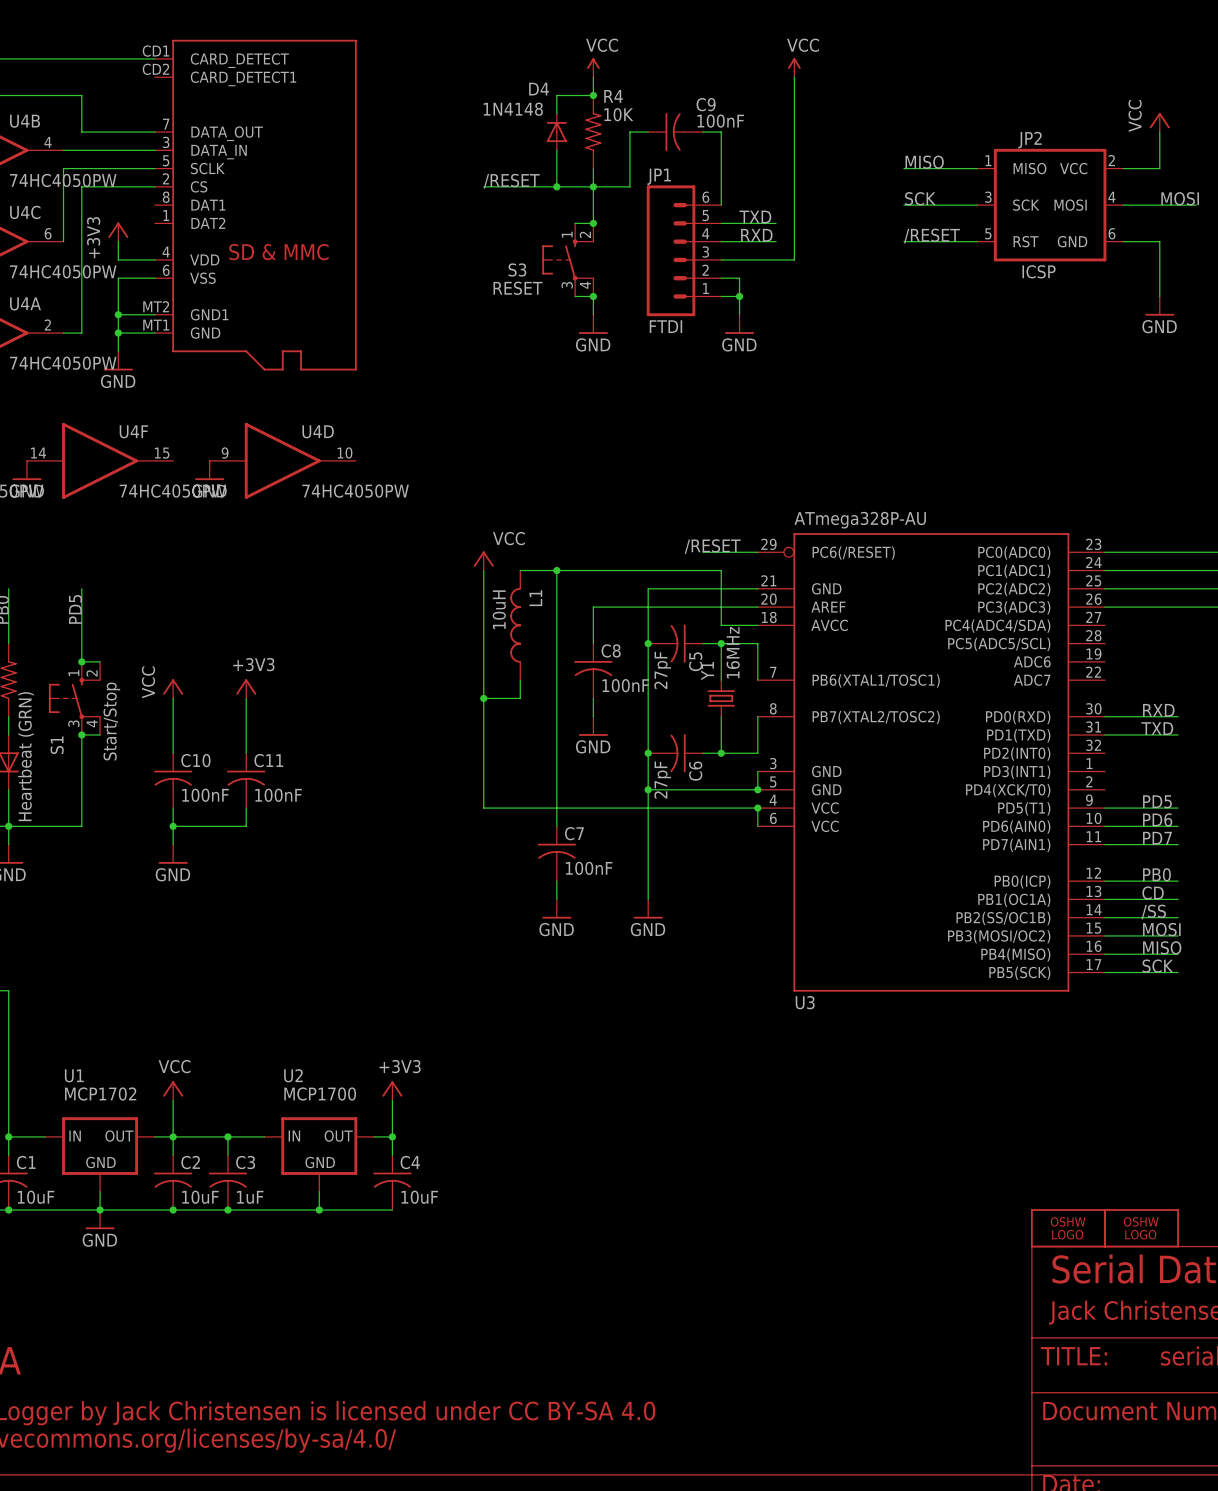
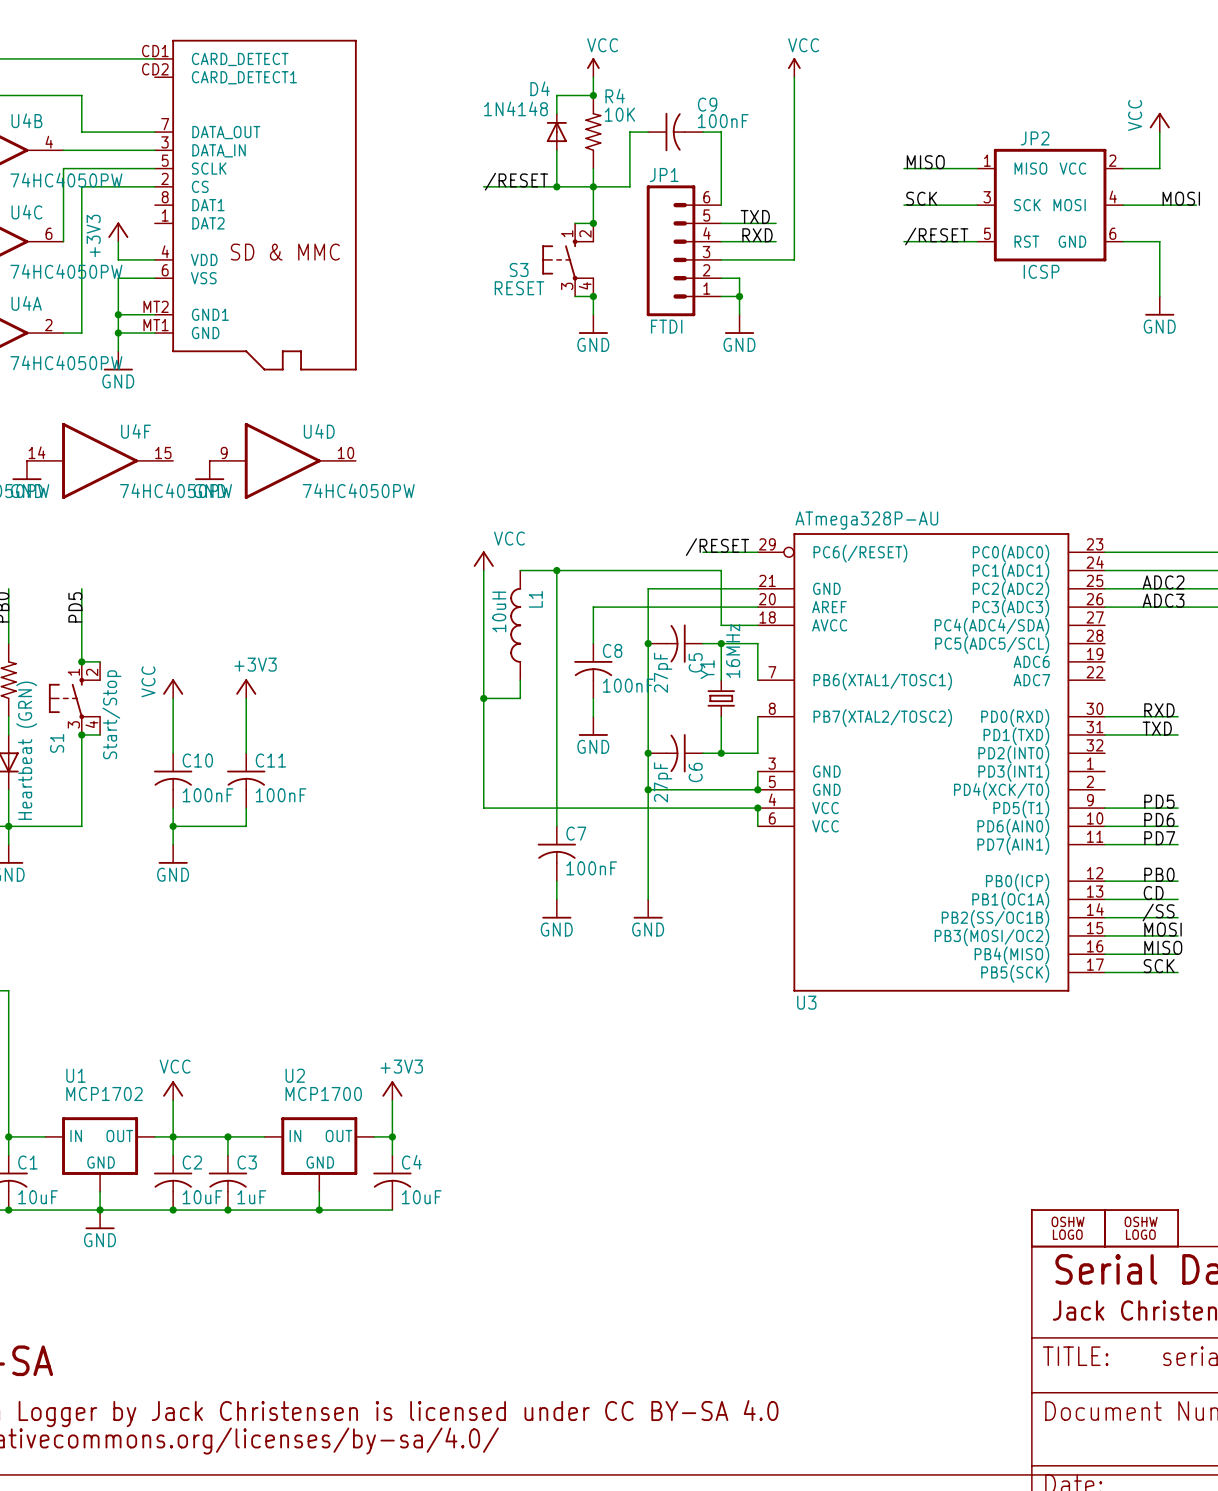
label: none -> ADC2 (1163, 582)
label: none -> ADC3 (1163, 600)

